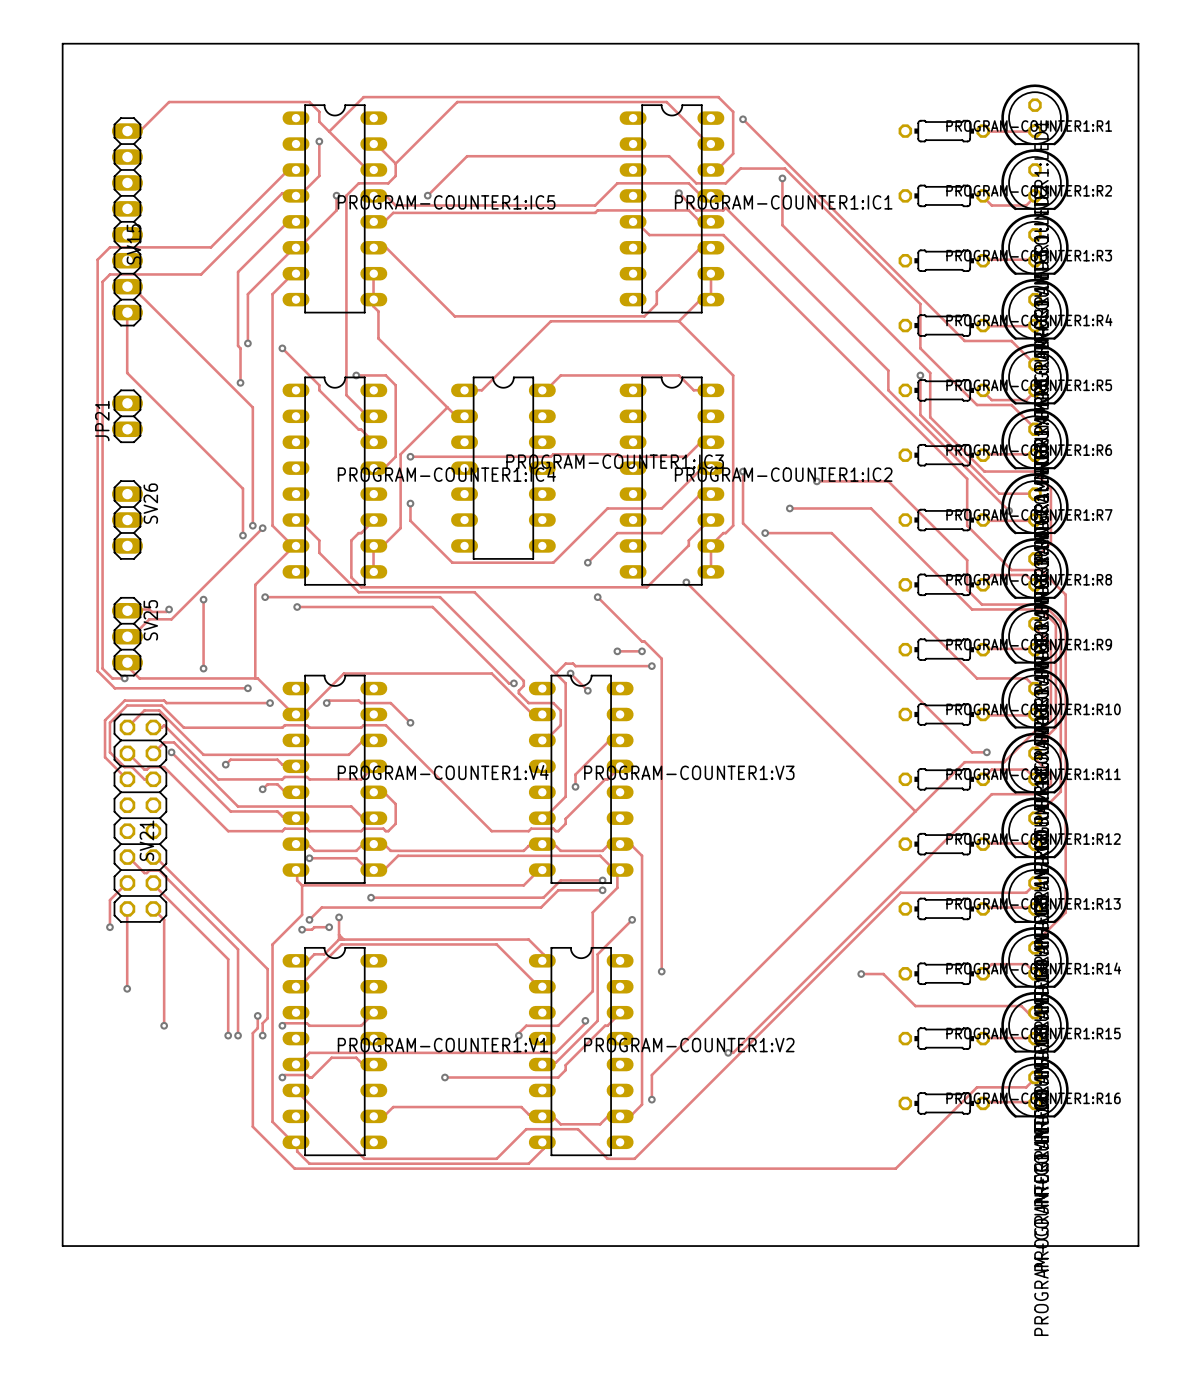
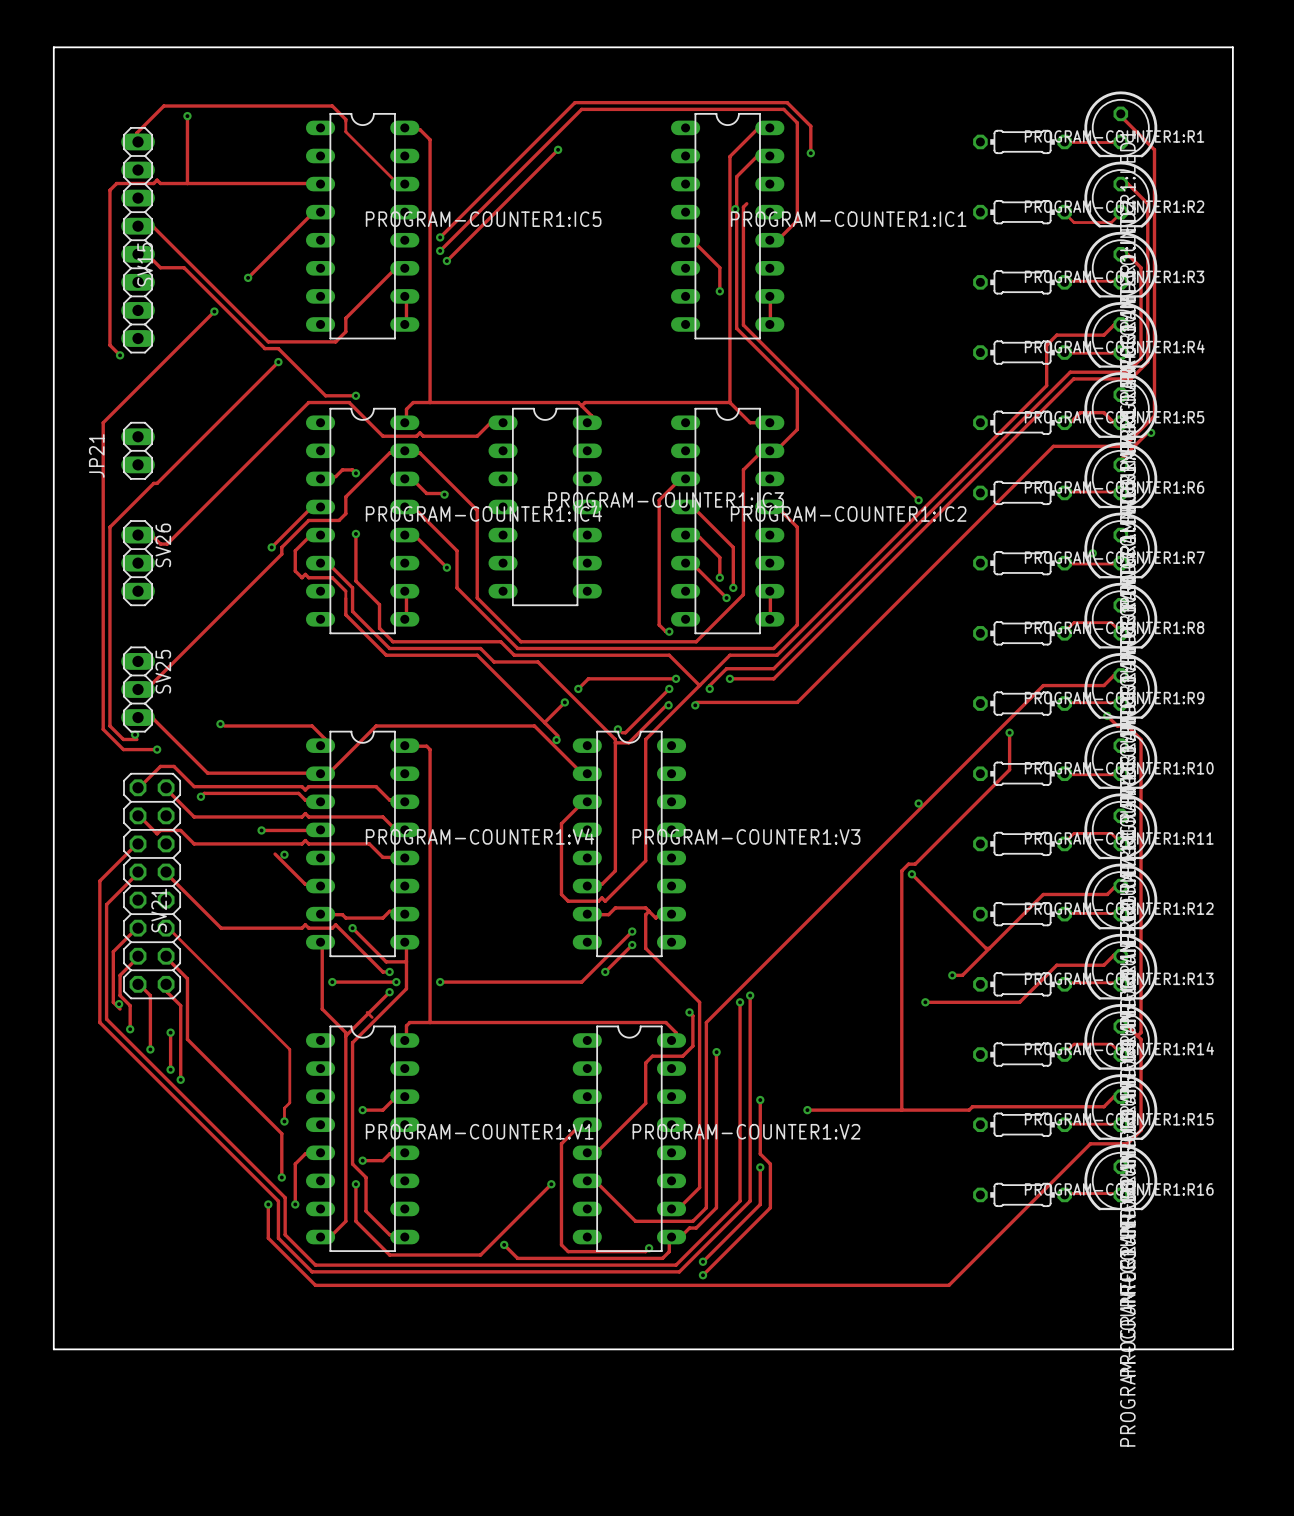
board edge: (62, 43) (62, 1246) -> (67, 47) (53, 47) (53, 1349) (67, 1349)
track: none -> (1120, 113) (1120, 116) (1154, 149) (1154, 416) (1124, 446) (1053, 446) (797, 702) (696, 702)
track: none -> (187, 116) (187, 183)
via: none -> (187, 116)
track: (319, 111) (309, 102) (169, 102) (141, 129) (129, 129) (127, 131) -> (345, 121) (332, 106) (163, 106) (136, 132) (138, 141)
track: none -> (404, 127) (419, 129) (430, 139) (430, 402)
track: none -> (769, 127) (756, 129) (729, 156) (729, 402)
track: (743, 119) (964, 340) (1011, 340) (1034, 364) -> none
via position: (743, 119) -> (810, 153)
track: (329, 131) (363, 97) (718, 97) (733, 111) (733, 153) (718, 168) (710, 169) -> none
track: none -> (558, 149) (446, 261)
via: none -> (558, 149)
track: (319, 141) (319, 175) (297, 198) (292, 193) (282, 193) (201, 274) (109, 274) (102, 281) (102, 668) (112, 678) (124, 678) -> none
via: (319, 141) -> none
track: none -> (810, 153) (810, 126) (787, 102) (574, 102) (440, 237)
track: (373, 144) (375, 143) (395, 163) -> none
track: (710, 144) (708, 143) (666, 102) (457, 102) (395, 163) -> (769, 155) (756, 156) (736, 176) (736, 328) (797, 389) (797, 429) (777, 449) (760, 453) (743, 469) (743, 594) (696, 641) (521, 641) (477, 597) (477, 510) (419, 453) (406, 453) (404, 450) (403, 453) (389, 453) (345, 496) (345, 513) (339, 520) (308, 520) (281, 547) (281, 554) (147, 688) (138, 689)
track: (395, 163) (395, 175) (388, 183) (358, 183) (346, 195) (346, 395) (366, 414) (373, 416) -> none
track: (296, 169) (287, 171) (210, 247) (109, 247) (97, 259) (97, 671) (114, 688) (247, 688) -> (320, 184) (160, 183) (157, 180) (153, 183) (116, 183) (109, 190) (109, 345) (120, 355)
track: none -> (1120, 184) (1127, 183) (1147, 203) (1147, 362) (1130, 378) (1073, 378) (773, 678) (729, 678)
track: (782, 178) (782, 225) (930, 373) (930, 417) (984, 471) (1033, 471) (1050, 488) (1050, 542) (1034, 558) -> none
via: (782, 178) -> none
track: none -> (746, 203) (743, 207) (743, 325) (918, 500)
track: (678, 193) (696, 210) (723, 210) (725, 207) (888, 370) (888, 390) (1009, 510) -> none
track: none -> (320, 212) (312, 213) (248, 277)
track: (336, 195) (336, 210) (297, 249) (294, 247) (247, 294) (247, 343) -> none
via: (336, 195) -> none
track: (373, 195) (385, 195) (395, 205) (595, 205) (617, 183) (688, 183) (701, 195) (710, 195) -> none
track: (427, 195) (467, 156) (669, 156) (696, 183) (725, 183) (740, 168) (784, 168) (920, 304) (920, 348) (977, 405) (1011, 405) (1034, 429) -> (1151, 432) (1147, 432) (1120, 459) (1120, 464)
via: (427, 195) -> none
via: none -> (440, 237)
track: (296, 221) (287, 222) (238, 272) (238, 345) (240, 348) (240, 382) -> none
track: (373, 221) (385, 220) (393, 212) (595, 212) (597, 210) (688, 210) (698, 220) (710, 221) -> (440, 250) (581, 109) (783, 109) (797, 122) (797, 220) (780, 237) (770, 237) (769, 240)
track: (633, 221) (637, 222) (649, 235) (723, 235) (967, 478) (967, 525) (1011, 570) (1041, 570) (1065, 594) (1065, 912) (1036, 942) (1034, 947) -> (685, 240) (692, 240) (719, 267) (719, 291)
via: none -> (440, 250)
track: none -> (138, 254) (147, 254) (160, 267) (184, 267) (264, 348) (278, 348) (325, 395) (355, 395)
track: none -> (1120, 254) (1127, 254) (1141, 267) (1141, 358) (1127, 372) (1070, 372) (773, 668) (726, 668) (709, 685) (709, 688)
via: none -> (446, 261)
track: (373, 247) (385, 247) (454, 316) (644, 316) (656, 304) (656, 291) (698, 249) (708, 249) (710, 247) -> (404, 268) (403, 271) (392, 271) (345, 318) (345, 331) (335, 341) (268, 341) (153, 227) (138, 226)
via: none -> (248, 277)
via: none -> (719, 291)
track: (296, 273) (292, 274) (272, 294) (272, 525) (294, 547) (292, 547) (255, 584) (255, 678) -> none
track: (373, 273) (373, 306) (378, 311) (378, 338) (454, 414) (464, 416) -> (404, 296) (406, 298) (406, 321) (404, 324)
track: (710, 273) (710, 299) (708, 301) (698, 301) (678, 321) -> (769, 296) (769, 324)
track: (127, 286) (137, 291) (252, 407) (252, 525) -> none
track: none -> (214, 311) (103, 422) (103, 729) (123, 749) (157, 749)
via: none -> (214, 311)
track: (127, 312) (127, 373) (242, 488) (242, 535) -> none
track: (678, 321) (733, 375) (733, 525) (711, 545) (710, 571) -> (769, 591) (769, 619)
track: (678, 321) (550, 321) (481, 390) (464, 390) -> (138, 535) (140, 537) (153, 537) (160, 544) (167, 544) (308, 402) (349, 402) (382, 436) (416, 436) (419, 432) (423, 436) (477, 436) (490, 422) (503, 422)
via: none -> (120, 355)
track: none -> (278, 362) (157, 483) (153, 483) (109, 527) (109, 726) (123, 739) (136, 739)
via position: (247, 343) -> (278, 362)
track: (282, 348) (319, 385) (319, 390) (373, 442) -> (446, 493) (426, 493) (413, 480) (404, 478)
via: (282, 348) -> none
via: none -> (355, 395)
track: none -> (729, 402) (585, 402) (581, 405)
track: (356, 375) (385, 375) (395, 385) (395, 456) (385, 466) (373, 468) -> none
via: (356, 375) -> none
track: (920, 375) (920, 414) (999, 493) (1034, 494) -> none
via: (920, 375) -> none
via: (240, 382) -> none
track: none -> (404, 422) (406, 422) (406, 409) (413, 402) (578, 402) (591, 416) (591, 419) (587, 422)
track: (542, 390) (543, 392) (560, 375) (678, 375) (693, 390) (710, 390) -> (729, 402) (750, 422) (769, 422)
track: (983, 390) (991, 400) (1026, 400) (1034, 390) -> (1064, 422) (1070, 422) (1080, 412) (1103, 412) (1114, 422) (1120, 422)
via: none -> (1151, 432)
track: (447, 407) (400, 454) (400, 528) (383, 545) (373, 545) (373, 571) -> (404, 591) (406, 591) (406, 618) (404, 619)
JP21 name position: JP21 (102, 421) -> JP21 (96, 455)
track: none -> (355, 473) (352, 469) (342, 469) (335, 476) (322, 476) (320, 478)
via: none -> (355, 473)
track: none -> (685, 478) (679, 480) (659, 500) (659, 624) (665, 631) (669, 631)
track: (710, 442) (708, 444) (698, 444) (686, 456) (619, 456) (617, 454) (553, 454) (550, 456) (410, 456) -> none
track: none -> (320, 506) (312, 506) (271, 547)
track: none -> (685, 506) (692, 506) (733, 547) (733, 587)
track: (710, 468) (701, 469) (661, 508) (607, 508) (553, 562) (452, 562) (410, 520) (410, 503) -> (769, 506) (777, 506) (797, 527) (797, 624) (773, 648) (517, 648) (457, 587) (457, 550) (413, 506) (404, 506)
track: (743, 471) (743, 523) (972, 752) (986, 752) -> none
via: (743, 471) -> none
track: (816, 481) (888, 481) (967, 560) (967, 589) (981, 604) (1043, 604) (1060, 621) (1060, 791) (1033, 816) (1034, 818) -> (952, 975) (962, 975) (1043, 894) (1107, 894) (1114, 887) (1120, 887) (1120, 886)
via position: (816, 481) -> (918, 500)
track: none -> (355, 533) (355, 581) (379, 604) (379, 628) (392, 641) (500, 641) (514, 655) (669, 655) (699, 685)
via: none -> (355, 533)
track: none -> (404, 535) (406, 537) (416, 537) (446, 567)
track: none -> (685, 535) (686, 537) (699, 537) (719, 557) (719, 577)
track: (710, 494) (708, 496) (698, 496) (661, 533) (617, 533) (587, 562) -> none
via position: (410, 503) -> (446, 567)
via: none -> (271, 547)
track: (789, 508) (871, 508) (972, 609) (1041, 609) (1055, 624) (1055, 727) (1036, 747) (1034, 753) (1036, 759) (1050, 774) (1050, 784) (1041, 794) (991, 794) (733, 1052) (728, 1052) -> none
via: (789, 508) -> none
track: (296, 520) (297, 518) (319, 540) (319, 545) -> (320, 535) (318, 537) (308, 537) (295, 550) (295, 571) (302, 577) (305, 574) (308, 577) (332, 577) (345, 591)
track: (373, 520) (351, 540) (351, 577) (361, 587) (646, 587) (688, 545) (688, 540) (710, 520) -> none
track: none -> (685, 563) (692, 564) (726, 597)
via: (252, 525) -> none
track: (262, 528) (171, 619) (149, 619) (137, 631) (127, 636) -> none
via: (262, 528) -> none
via: none -> (719, 577)
track: (765, 533) (831, 533) (977, 678) (1026, 678) (1034, 688) -> none
via: (765, 533) -> none
via: (242, 535) -> none
via: none -> (733, 587)
track: (319, 552) (358, 592) (474, 592) (565, 683) (565, 796) (542, 818) -> (320, 563) (328, 564) (352, 587) (352, 611) (389, 648) (480, 648) (494, 661) (537, 661) (615, 739) (615, 870) (601, 884) (588, 884) (587, 886)
track: none -> (345, 598) (345, 614) (386, 655) (477, 655) (558, 736)
via: none -> (726, 597)
via: (587, 562) -> none
track: (686, 582) (915, 811) -> none
via: (686, 582) -> none
via: none -> (669, 631)
track: (265, 597) (440, 597) (523, 680) (523, 685) (518, 693) (528, 703) (553, 703) (560, 710) (560, 725) (542, 740) -> (1120, 324) (1114, 325) (1103, 335) (1056, 335) (1046, 345) (1046, 385) (777, 655) (729, 655) (645, 739) (645, 860) (605, 901) (601, 897) (598, 901) (568, 901) (561, 894) (561, 823) (581, 803) (587, 801)
via: (265, 597) -> none
track: (597, 597) (661, 658) (661, 971) -> none
via: (597, 597) -> none
track: (203, 599) (203, 668) -> none
via: (203, 599) -> none
track: (297, 607) (432, 607) (509, 683) (513, 683) -> none
via: (297, 607) -> none
track: (169, 609) (166, 611) (151, 611) (149, 609) (127, 610) -> none
via: (169, 609) -> none
track: (1034, 623) (1036, 629) (1050, 643) (1050, 720) (1041, 730) (1036, 730) (1004, 762) (964, 762) (651, 1075) (651, 1099) -> (1120, 675) (1114, 675) (1103, 685) (1043, 685) (706, 1022) (706, 1207) (692, 1221) (635, 1221) (595, 1180) (587, 1180)
track: none -> (676, 678) (588, 678) (578, 688)
via: none -> (676, 678)
via: none -> (729, 678)
via: none -> (578, 688)
track: none -> (669, 688) (625, 732) (622, 732)
via: none -> (669, 688)
via: none -> (709, 688)
track: none -> (564, 702) (544, 722)
via: none -> (564, 702)
track: none -> (669, 702) (628, 742) (615, 742)
track: (617, 651) (642, 651) -> none
track: none -> (1107, 715) (1117, 726) (1127, 726) (1141, 739) (1141, 1032) (1137, 1035)
via: none -> (1107, 715)
track: (127, 662) (129, 663) (129, 668) (139, 678) (257, 678) (296, 714) (304, 712) (343, 673) (491, 673) (531, 712) (542, 714) -> (138, 717) (153, 719) (207, 773) (328, 773) (376, 726) (534, 726) (581, 773) (587, 773)
track: (651, 666) (575, 666) (573, 663) (565, 663) (555, 673) -> none
via: (651, 666) -> none
track: none -> (224, 726) (312, 726) (325, 739) (325, 742) (320, 745)
track: (570, 673) (587, 690) -> none
track: none -> (1009, 732) (1009, 769) (915, 864) (908, 864) (901, 870) (901, 1110)
via: none -> (1009, 732)
via: (247, 688) -> none
track: none -> (404, 745) (426, 746) (430, 749) (430, 1022)
via: (587, 690) -> none
via: none -> (157, 749)
track: (270, 703) (166, 703) (164, 700) (124, 700) (105, 720) (105, 757) (127, 779) -> (750, 995) (750, 1201) (679, 1271) (312, 1271) (278, 1238) (278, 1201) (99, 1022) (99, 881) (138, 843)
via: (270, 703) -> none
track: (326, 703) (329, 700) (390, 703) (410, 722) -> none
via: (326, 703) -> none
via: (410, 722) -> none
track: (127, 727) (129, 722) (132, 722) (144, 710) (159, 710) (203, 754) (348, 754) (361, 742) (373, 742) (373, 740) -> (138, 787) (136, 786) (140, 783) (143, 783) (160, 766) (173, 766) (194, 786) (302, 786) (305, 790) (308, 786) (376, 786) (389, 800) (404, 801)
track: (153, 727) (161, 727) (164, 725) (218, 779) (282, 779) (284, 776) (307, 776) (309, 779) (361, 779) (373, 766) -> (166, 787) (163, 790) (167, 793) (170, 793) (194, 816) (302, 816) (305, 813) (308, 816) (382, 816) (392, 827) (403, 827) (404, 829)
track: none -> (200, 796) (204, 793) (298, 793) (305, 800) (320, 801)
track: (620, 740) (619, 742) (607, 742) (575, 774) (575, 786) -> none
via: none -> (918, 803)
track: (171, 752) (230, 811) (277, 811) (282, 816) (294, 816) (296, 818) -> (275, 854) (305, 884) (320, 886)
via position: (171, 752) -> (200, 796)
via: (986, 752) -> none
track: (127, 753) (144, 769) (149, 767) (164, 767) (228, 831) (282, 831) (284, 828) (307, 828) (309, 831) (361, 831) (363, 828) (383, 828) (388, 831) (395, 823) (395, 804) (385, 794) (375, 794) (373, 792) -> (138, 815) (136, 816) (140, 820) (143, 820) (157, 833) (160, 830) (180, 830) (194, 843) (302, 843) (305, 840) (308, 843) (369, 843) (382, 857) (404, 857)
track: (153, 753) (164, 742) (174, 742) (238, 806) (351, 806) (361, 816) (373, 816) (373, 818) -> none
track: (225, 764) (230, 759) (277, 759) (282, 764) (294, 764) (296, 766) -> (261, 830) (320, 829)
via position: (225, 764) -> (261, 830)
track: (620, 766) (565, 818) (565, 823) (558, 831) (553, 828) (491, 831) (385, 725) (363, 725) (361, 727) (309, 727) (307, 725) (284, 725) (282, 727) (183, 727) (161, 705) (127, 705) (109, 722) (109, 752) (124, 767) (132, 767) (144, 779) (153, 779) -> none
via: (575, 786) -> none
track: (262, 789) (267, 784) (277, 784) (284, 791) (296, 792) -> none
track: none -> (138, 872) (136, 870) (133, 874) (133, 877) (106, 904) (106, 1019) (285, 1197) (285, 1234) (315, 1265) (676, 1265) (740, 1201) (740, 1002)
track: none -> (166, 872) (163, 874) (167, 877) (170, 877) (221, 928) (302, 928) (305, 924) (308, 928) (332, 928) (335, 924) (382, 971) (389, 971)
track: none -> (911, 874) (986, 948) (989, 948)
via: none -> (911, 874)
track: none -> (649, 911) (645, 914) (645, 948) (699, 1002) (699, 1187) (679, 1207) (671, 1208)
track: (296, 844) (297, 845) (309, 845) (314, 850) (356, 850) (361, 845) (373, 845) (373, 844) (385, 845) (390, 850) (523, 850) (528, 845) (541, 845) (542, 844) (543, 845) (555, 845) (560, 850) (602, 850) (607, 845) (619, 845) (620, 844) (632, 845) (642, 855) (642, 1104) (632, 1114) (607, 1116) (600, 1124) (560, 1124) (553, 1116) (528, 1114) (521, 1107) (393, 1107) (385, 1114) (375, 1114) (373, 1116) -> (320, 914) (342, 914) (345, 918) (382, 918) (389, 911) (403, 911) (404, 914)
track: none -> (587, 914) (608, 914) (615, 907) (645, 907) (655, 918) (659, 914) (671, 914)
track: (127, 857) (144, 873) (149, 870) (159, 870) (238, 949) (238, 1035) -> (138, 928) (113, 951) (113, 1002) (120, 1009)
track: none -> (352, 928) (386, 961) (406, 961)
track: (309, 858) (356, 858) (366, 868) (373, 868) (373, 870) (375, 868) (385, 868) (398, 855) (600, 855) (612, 868) (619, 868) (620, 870) (617, 868) (617, 887) (592, 912) (592, 991) (558, 1025) (526, 1025) (518, 1035) -> none
via position: (309, 858) -> (352, 928)
track: none -> (632, 931) (581, 982) (440, 982)
via: none -> (632, 931)
track: (296, 870) (297, 880) (302, 885) -> (320, 942) (322, 945) (322, 1009) (345, 1032) (345, 1221) (332, 1234) (322, 1234) (320, 1237)
track: none -> (404, 942) (406, 945) (406, 988) (352, 1042) (352, 1164) (366, 1177) (366, 1211) (389, 1234) (403, 1234) (404, 1237)
track: (542, 870) (541, 868) (523, 885) (302, 885) -> none
track: none -> (632, 945) (605, 971)
via: none -> (632, 945)
track: (602, 880) (560, 880) (543, 897) (371, 897) -> none
via: (602, 880) -> none
track: (127, 883) (109, 900) (109, 927) -> (138, 956) (136, 955) (133, 958) (133, 961) (120, 975) (120, 995) (130, 1005) (130, 1029)
track: (153, 883) (228, 959) (228, 1035) -> (166, 956) (163, 958) (167, 961) (170, 961) (187, 978) (187, 1039) (281, 1133) (281, 1177)
track: (1034, 883) (1026, 892) (900, 892) (634, 1158) (607, 1158) (577, 1129) (526, 1129) (496, 1158) (364, 1158) (296, 1090) -> (1120, 956) (1114, 955) (1103, 965) (1056, 965) (1019, 1002) (925, 1002)
track: (302, 885) (302, 914) (272, 944) (272, 1121) (294, 1144) (296, 1142) (297, 1151) (309, 1163) (528, 1163) (543, 1148) (542, 1142) -> none
track: (602, 890) (558, 890) (541, 907) (321, 907) (309, 919) -> none
via: (602, 890) -> none
via: none -> (389, 971)
via: (371, 897) -> none
via: none -> (605, 971)
via: none -> (952, 975)
track: none -> (332, 982) (396, 982)
via: none -> (332, 982)
via: none -> (396, 982)
via: none -> (440, 982)
track: (127, 908) (127, 988) -> (138, 984) (136, 985) (140, 988) (143, 988) (150, 995) (150, 1049)
track: (153, 908) (164, 919) (164, 1025) -> (166, 984) (167, 992) (180, 1005) (180, 1079)
track: none -> (389, 992) (345, 1035)
via: none -> (389, 992)
track: (339, 917) (339, 939) (528, 939) (543, 954) (542, 960) -> none
via: (339, 917) -> none
via: (309, 919) -> none
track: (632, 919) (597, 954) (597, 1020) (555, 1062) (543, 1062) (542, 1064) -> (689, 1012) (692, 1015) (692, 1046) (682, 1056) (652, 1056) (645, 1062) (645, 1103) (598, 1150) (588, 1150) (587, 1152)
via position: (632, 919) -> (689, 1012)
via: none -> (750, 995)
via: none -> (740, 1002)
via: none -> (925, 1002)
track: (329, 927) (302, 929) -> none
via: (329, 927) -> none
via: (302, 929) -> none
track: (343, 939) (339, 939) (324, 954) (314, 954) (309, 959) (296, 960) -> none
track: none -> (1120, 1026) (1127, 1025) (1141, 1039) (1141, 1130) (1127, 1143) (1090, 1143) (948, 1285) (315, 1285) (268, 1238) (268, 1204)
via: none -> (130, 1029)
track: none -> (170, 1032) (170, 1069)
via: none -> (170, 1032)
track: none -> (404, 1040) (406, 1039) (406, 1025) (409, 1022) (665, 1022) (676, 1032) (676, 1035) (671, 1040)
via: none -> (150, 1049)
track: none -> (716, 1052) (716, 1207) (696, 1228) (689, 1228) (682, 1234) (672, 1234) (669, 1238) (669, 1251) (662, 1258) (517, 1258) (504, 1244)
track: (861, 974) (883, 974) (915, 1006) (1021, 1006) (1028, 1013) (1034, 1012) -> (807, 1110) (969, 1110) (972, 1106) (1103, 1106) (1114, 1096) (1120, 1096)
via: (861, 974) -> none
track: (296, 986) (304, 981) (341, 944) (496, 944) (541, 988) (542, 986) -> none
via: none -> (170, 1069)
via: (127, 988) -> none
via: none -> (180, 1079)
track: (373, 1012) (361, 1025) (309, 1025) (307, 1023) (284, 1023) (282, 1025) -> (404, 1096) (396, 1096) (382, 1110) (362, 1110)
track: (620, 1012) (565, 1065) (565, 1070) (558, 1077) (444, 1077) -> none
track: (257, 1015) (257, 1028) (252, 1033) (252, 1126) (294, 1168) (895, 1168) (977, 1087) (1026, 1087) (1034, 1077) -> none
via: (257, 1015) -> none
track: none -> (760, 1100) (760, 1153) (770, 1164) (770, 1207) (702, 1275)
via: none -> (760, 1100)
track: (585, 1020) (585, 1023) (555, 1052) (309, 1052) (296, 1064) -> (295, 1204) (295, 1164) (305, 1153) (320, 1152)
via: (585, 1020) -> none
via: (164, 1025) -> none
via: (282, 1025) -> none
via: none -> (362, 1110)
via: none -> (807, 1110)
via: (228, 1035) -> none
via: (238, 1035) -> none
via: (518, 1035) -> none
track: none -> (587, 1124) (585, 1126) (578, 1126) (561, 1143) (561, 1244) (568, 1251) (645, 1251) (649, 1248)
via: (728, 1052) -> none
track: (373, 1064) (373, 1062) (361, 1062) (356, 1057) (331, 1057) (311, 1077) (307, 1075) (284, 1075) (282, 1077) -> (404, 1152) (389, 1153) (382, 1160) (362, 1160)
via: none -> (362, 1160)
via: (282, 1077) -> none
via: (444, 1077) -> none
track: none -> (760, 1167) (760, 1204) (702, 1261)
via: none -> (760, 1167)
via: none -> (281, 1177)
track: none -> (355, 1184) (355, 1221) (389, 1255) (480, 1255) (551, 1184)
via: none -> (355, 1184)
via: none -> (551, 1184)
via: (651, 1099) -> none
via: none -> (268, 1204)
via: none -> (295, 1204)
via: none -> (504, 1244)
via: none -> (649, 1248)
via: none -> (702, 1261)
via: none -> (702, 1275)

